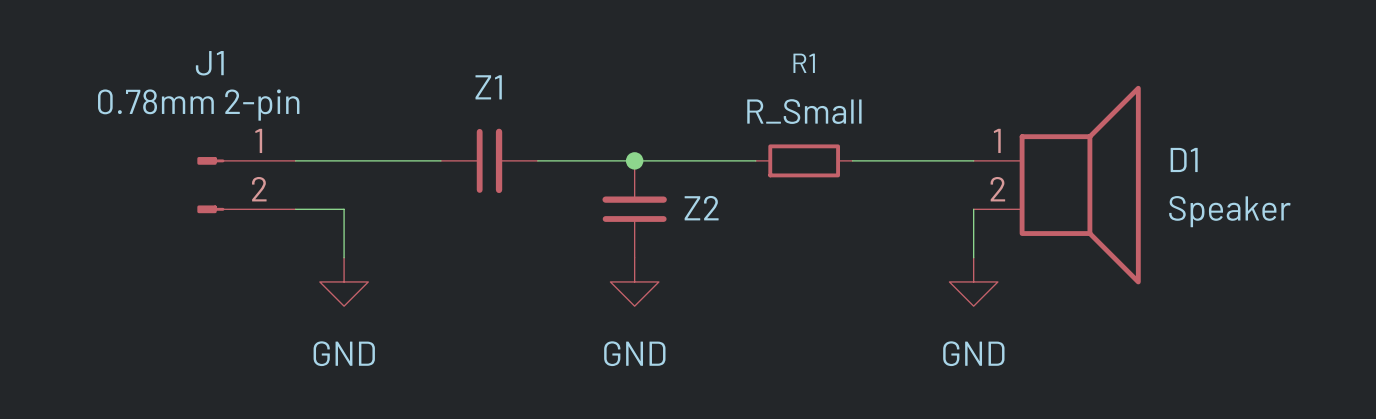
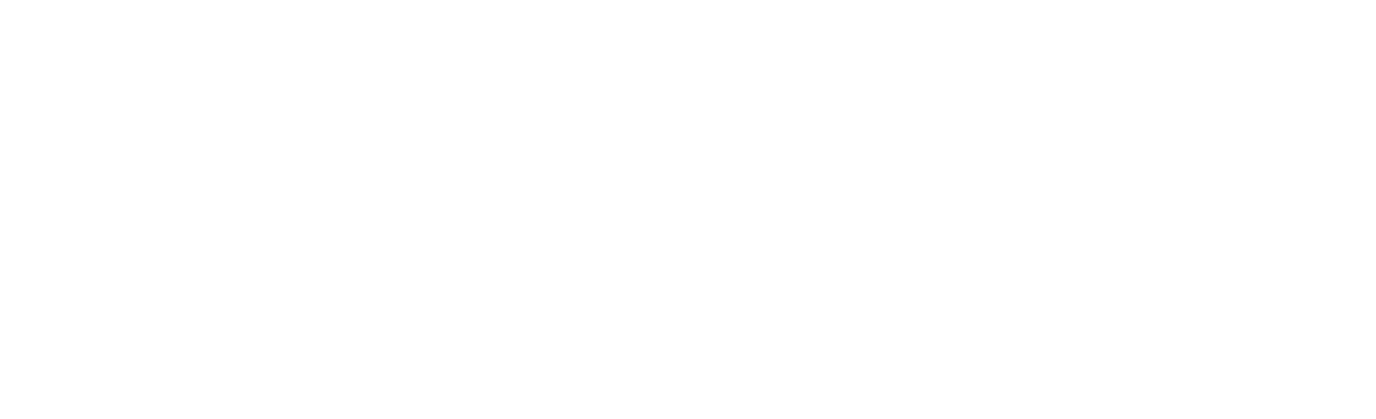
wire: (295, 160) (440, 160) -> none
Z1: (489, 160) -> none
wire: (537, 160) (755, 160) -> none
junction: (634, 160) -> none
R1: R_Small (804, 160) -> none
wire: (852, 160) (973, 160) -> none
J1: 0.78mm 2-pin (246, 185) -> none
D1: Speaker (1057, 185) -> none
wire: (295, 209) (344, 209) (344, 257) -> none
Z2: (634, 209) -> none
wire: (973, 209) (973, 257) -> none
power symbol: GND (344, 281) -> none
power symbol: GND (634, 281) -> none
power symbol: GND (973, 281) -> none

